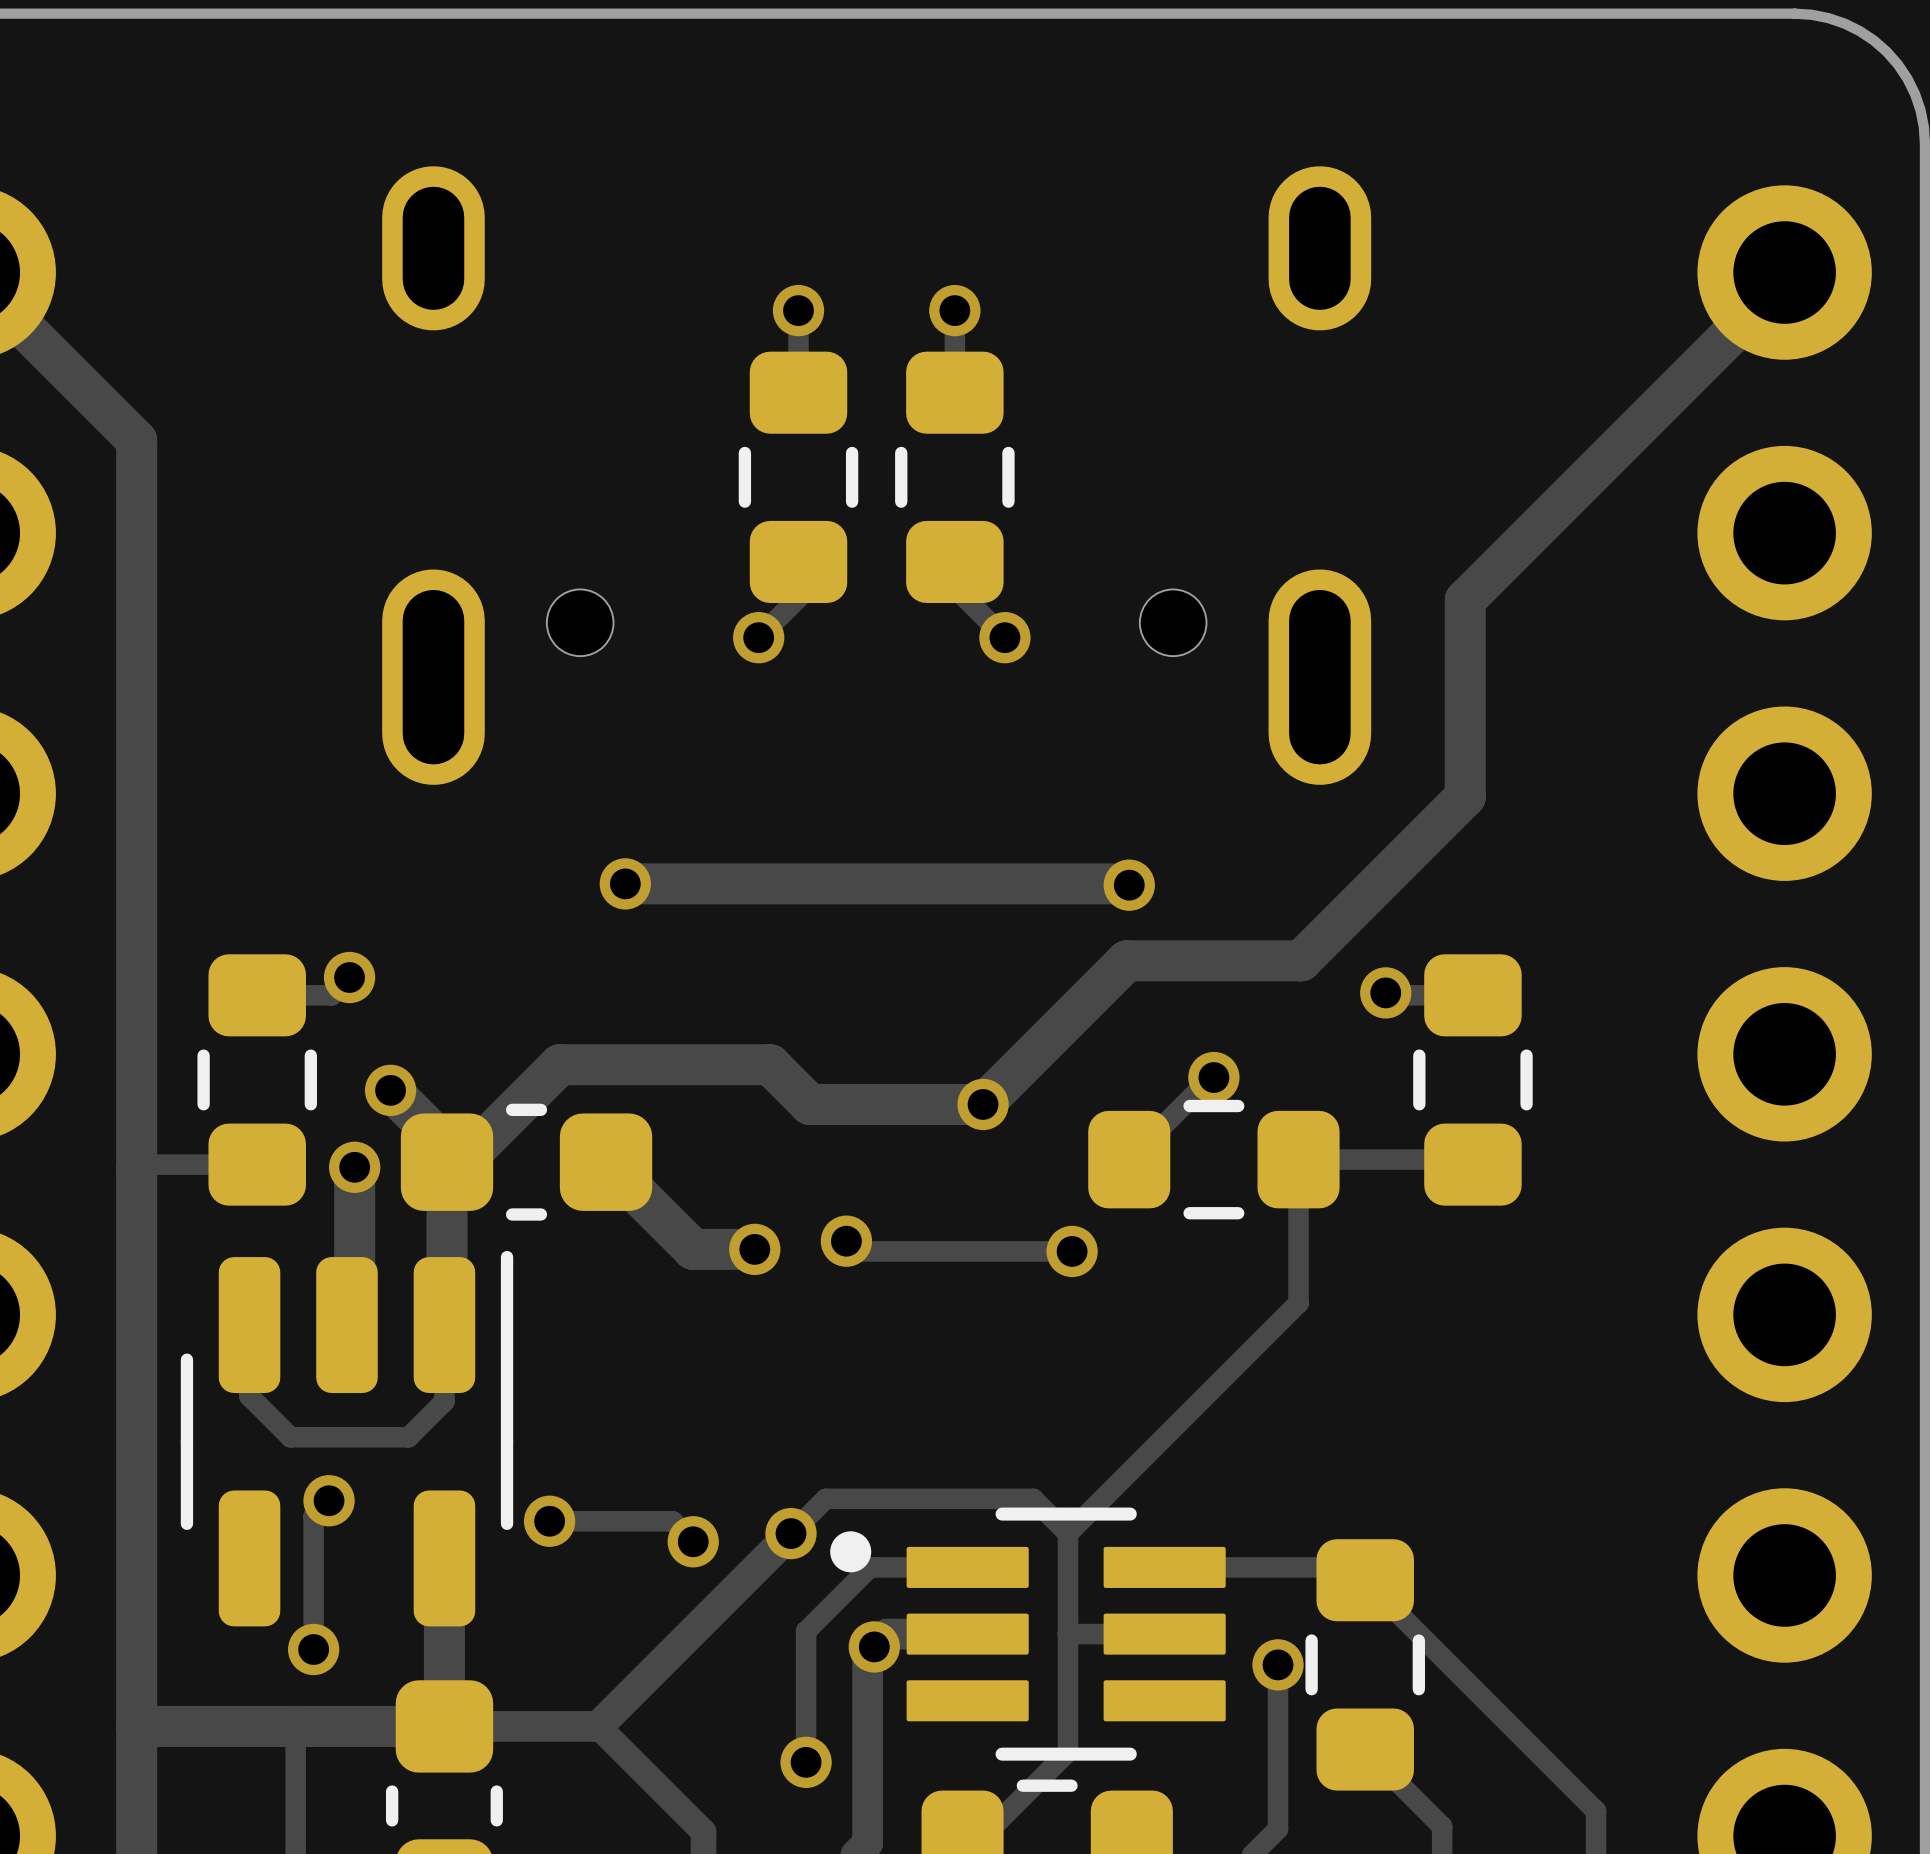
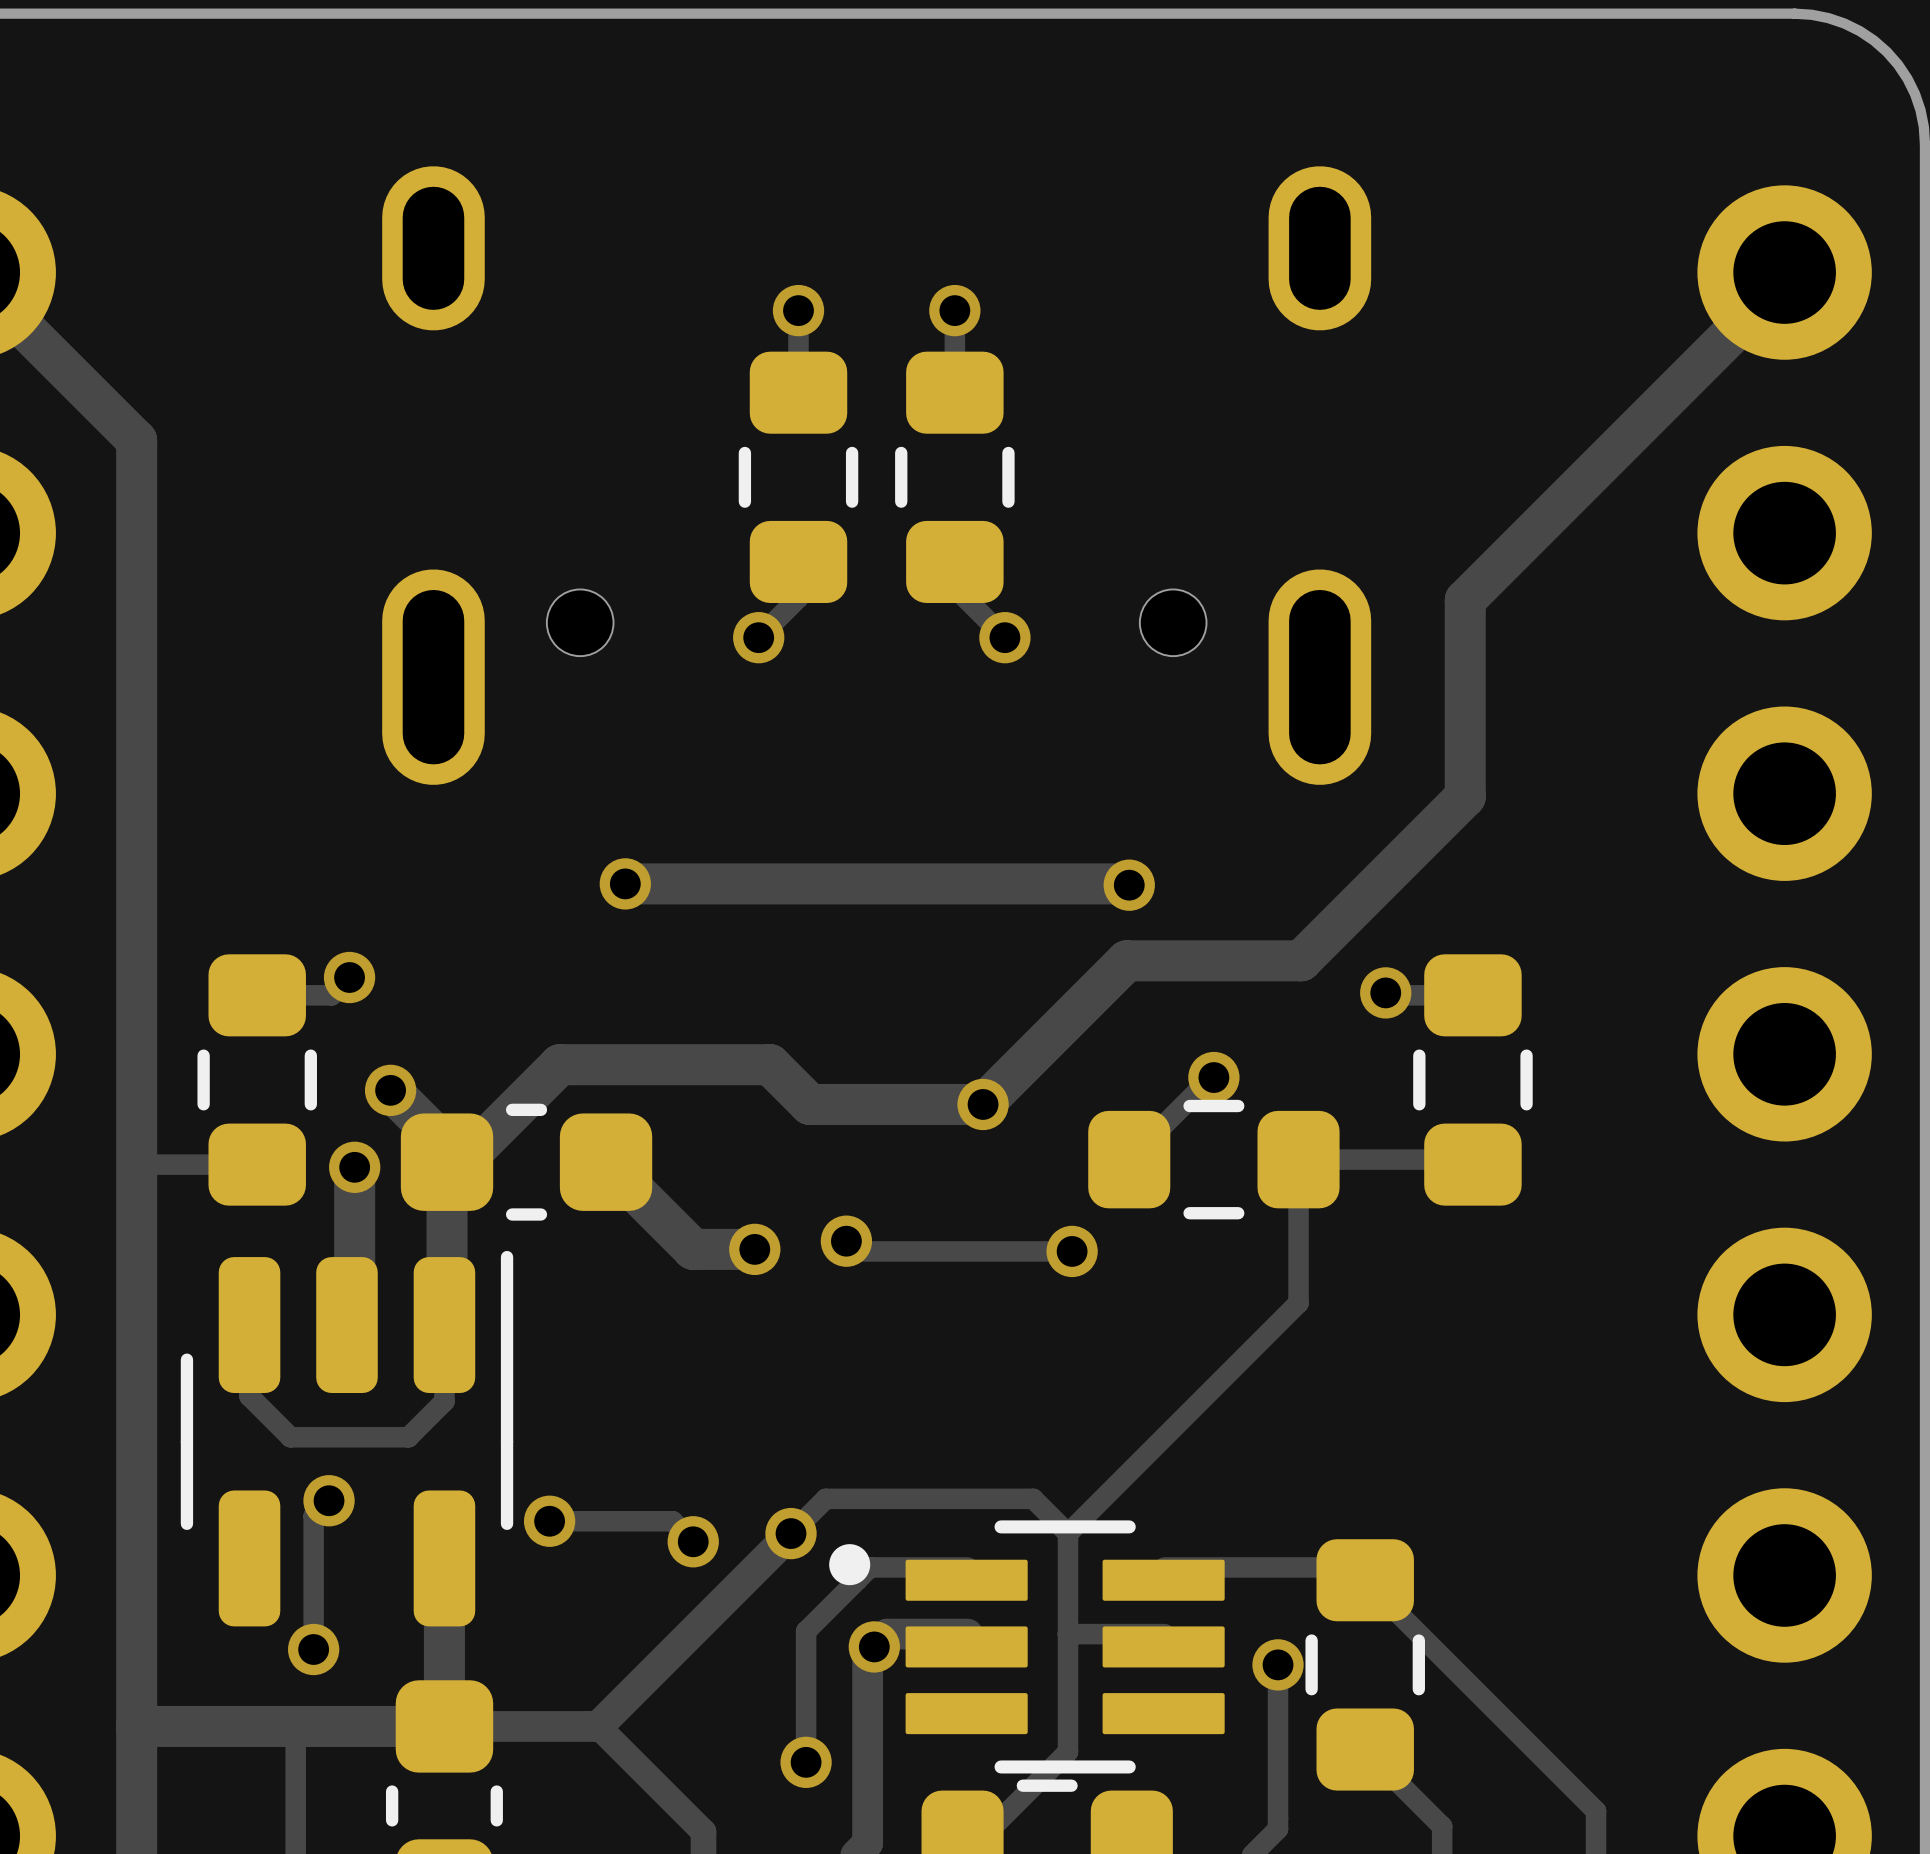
part position: (1027, 1634) -> (1026, 1646)

